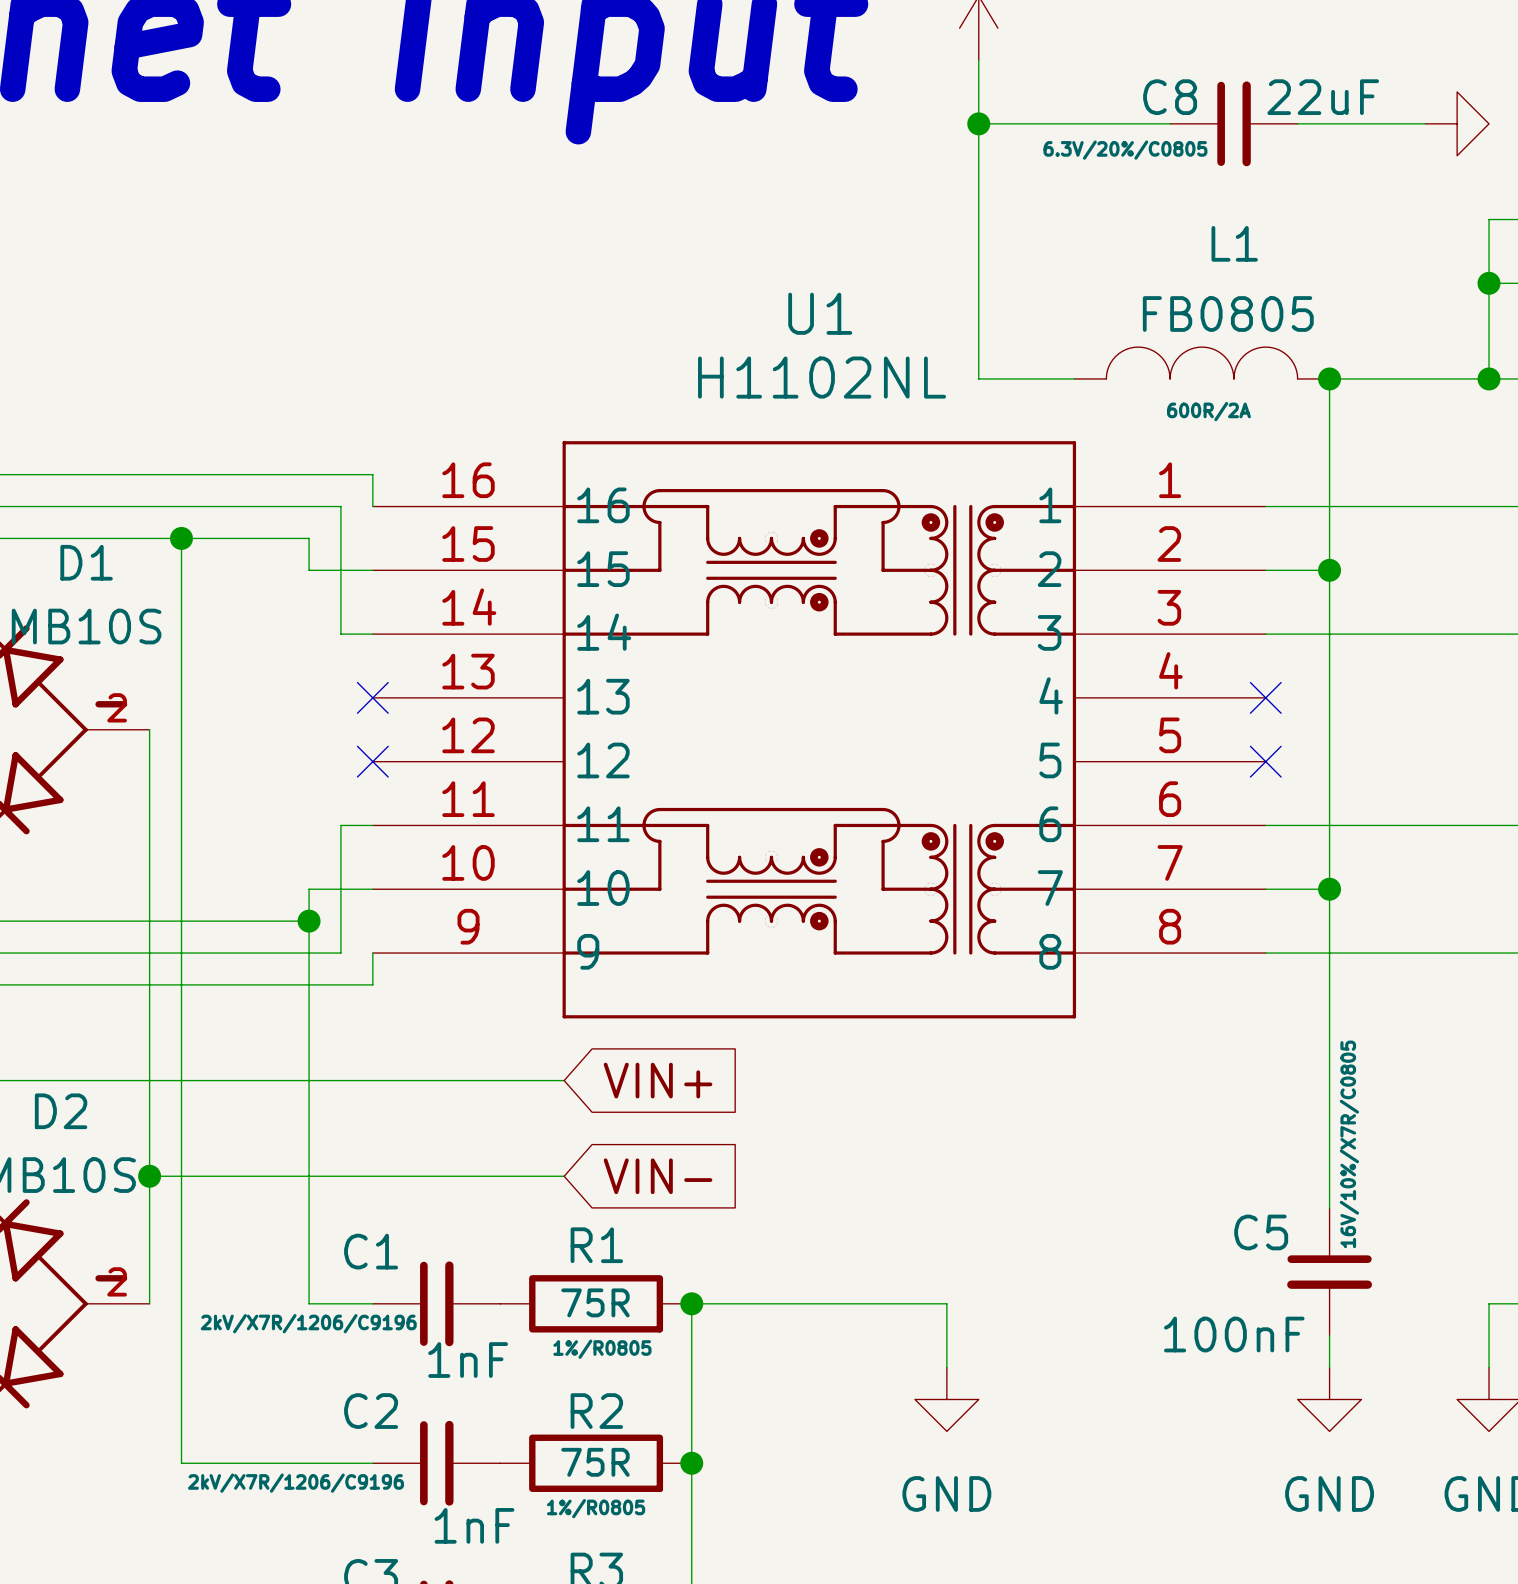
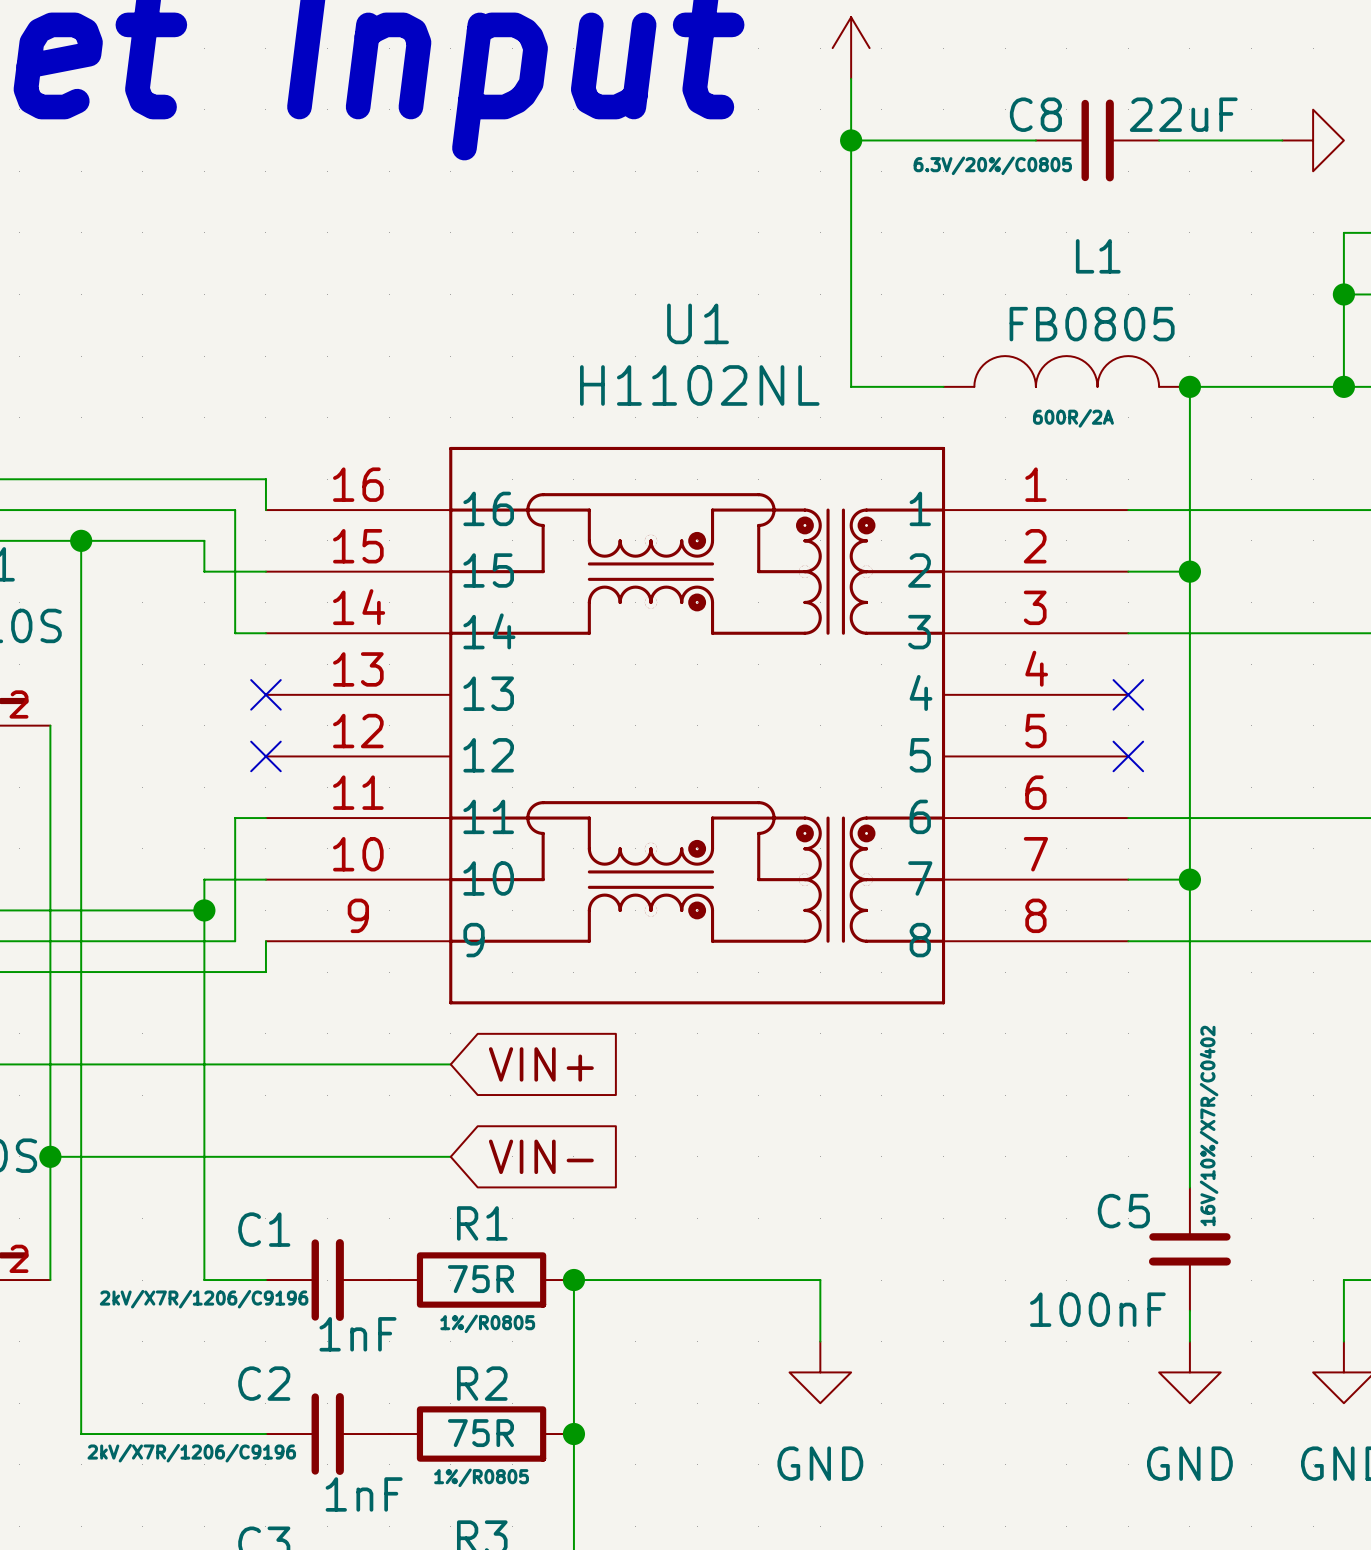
C5 text: 16V/10%/X7R/C0805 (1349, 1144) -> 16V/10%/X7R/C0402 (1209, 1126)

